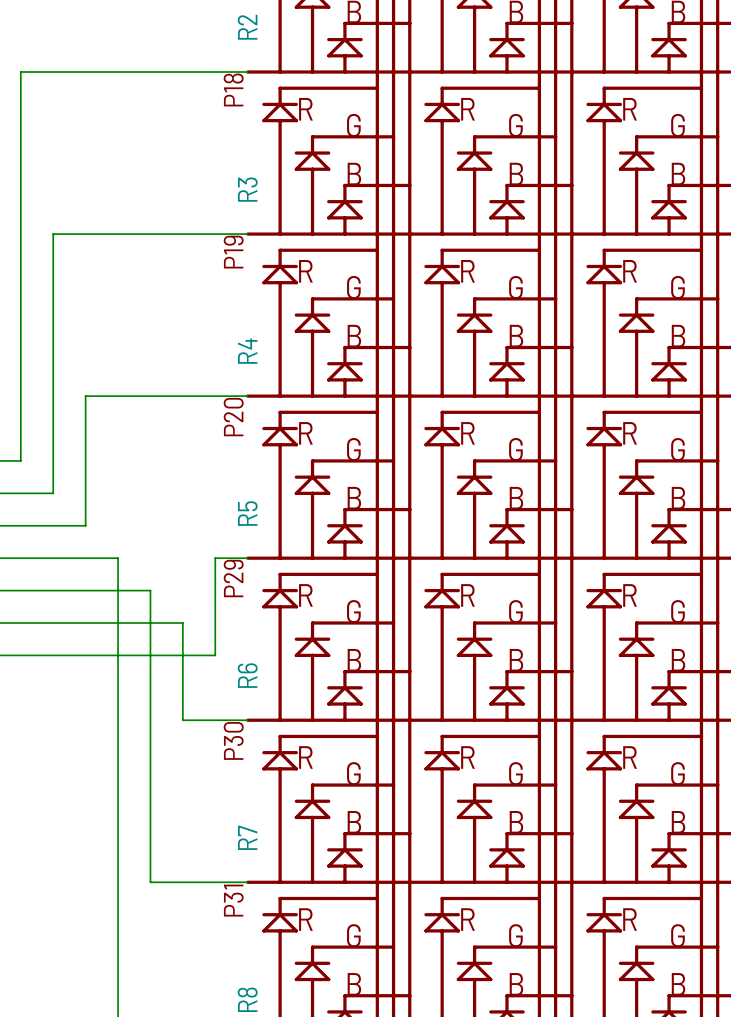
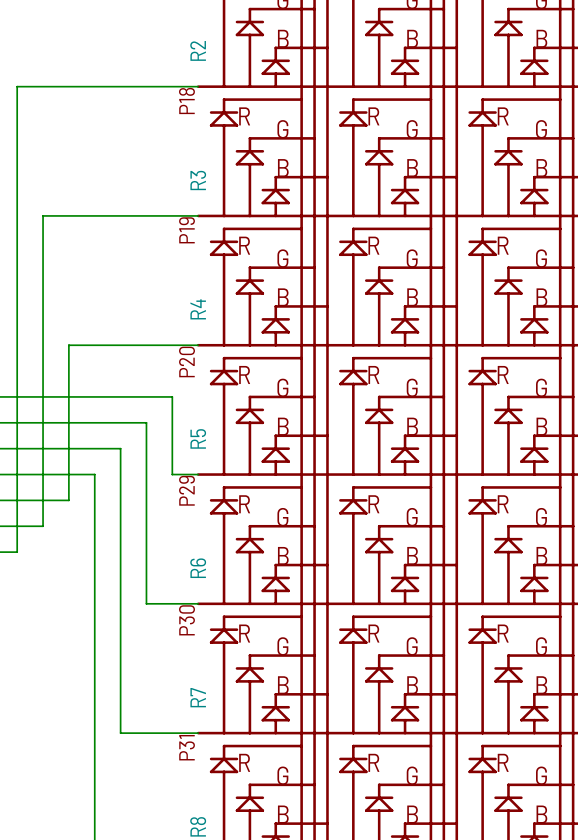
wire: (215, 558) (215, 655) (20, 655) -> (172, 474) (172, 396) (17, 396) (17, 552)
wire: (85, 590) (150, 590) -> (68, 500) (68, 448) (120, 448) (120, 500)
wire: (53, 623) (182, 623) -> (43, 526) (43, 422) (146, 422) (146, 526)

